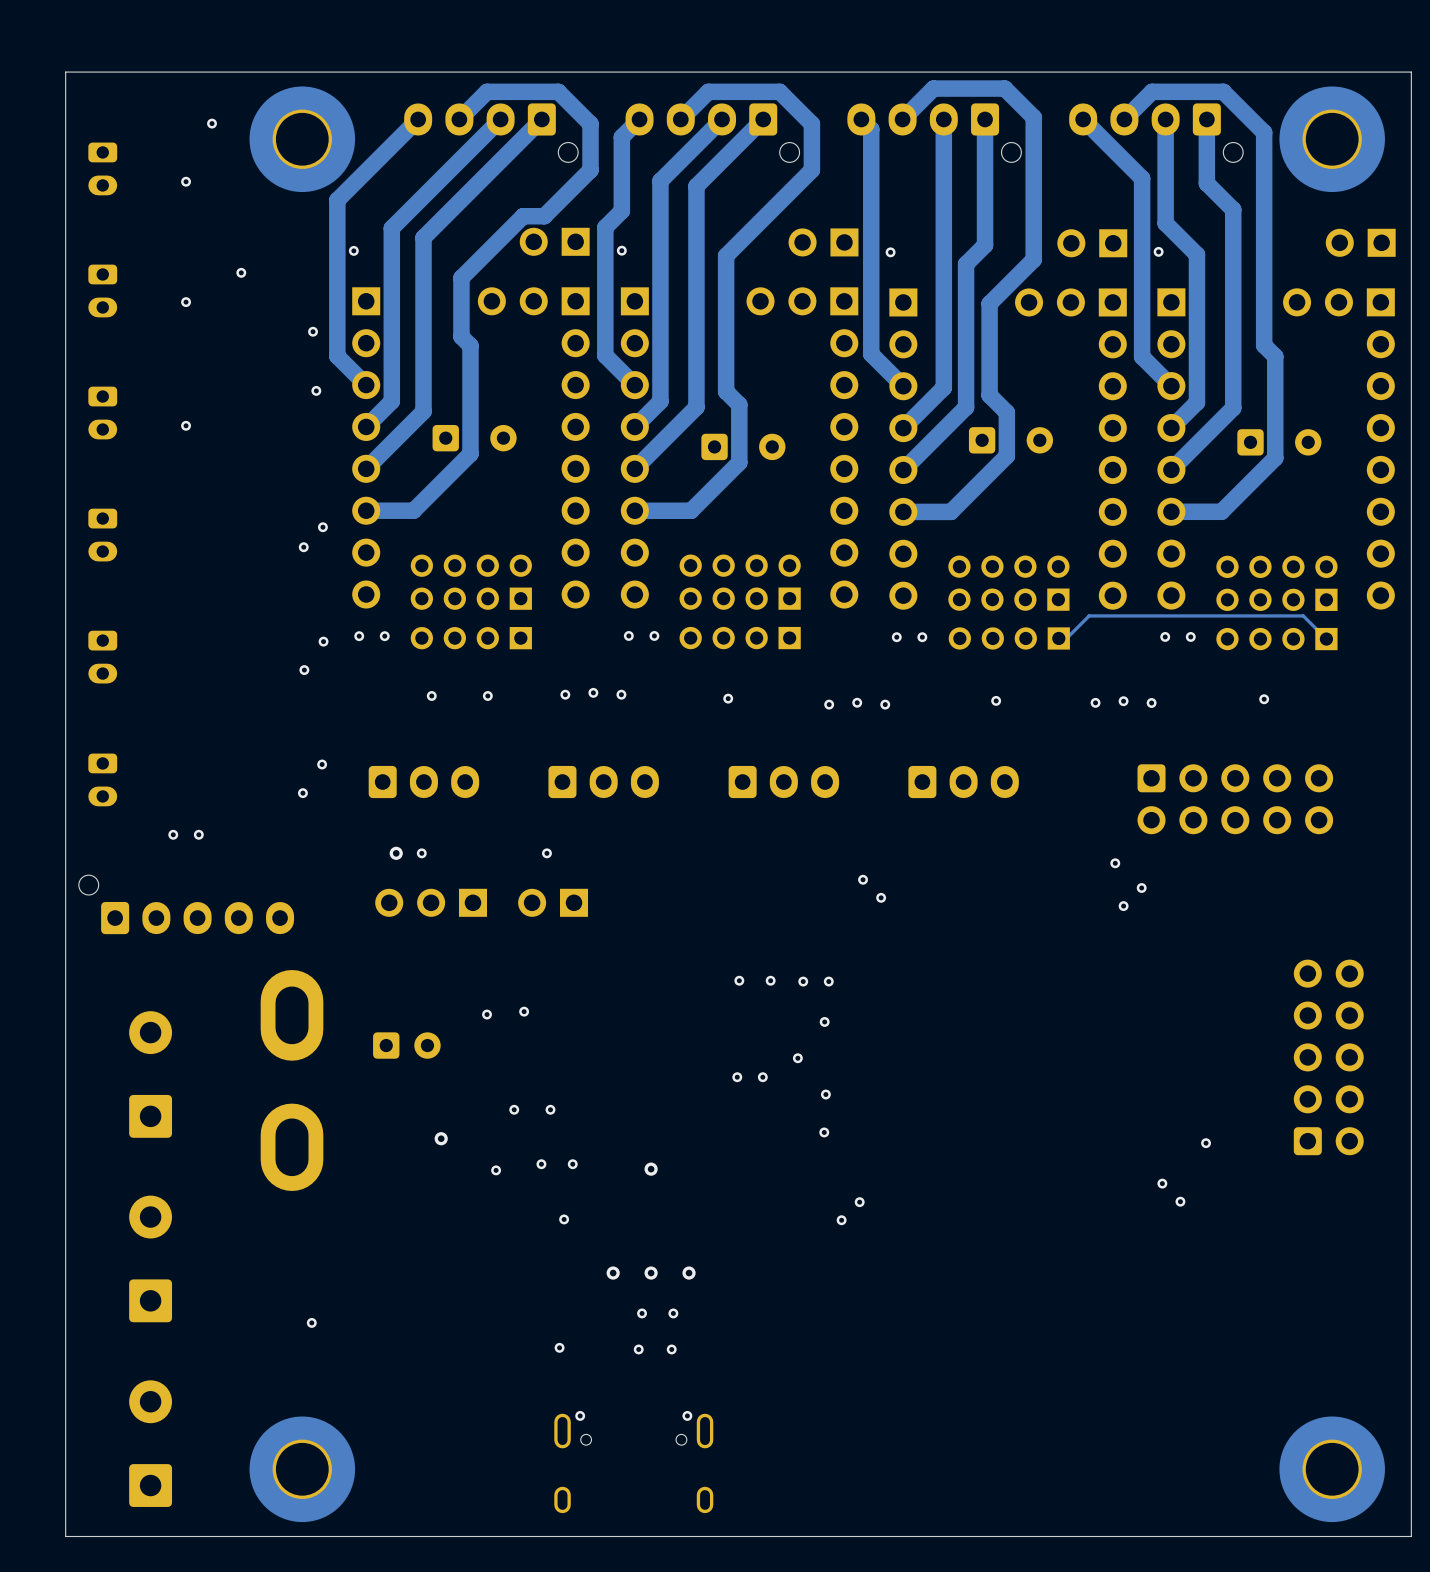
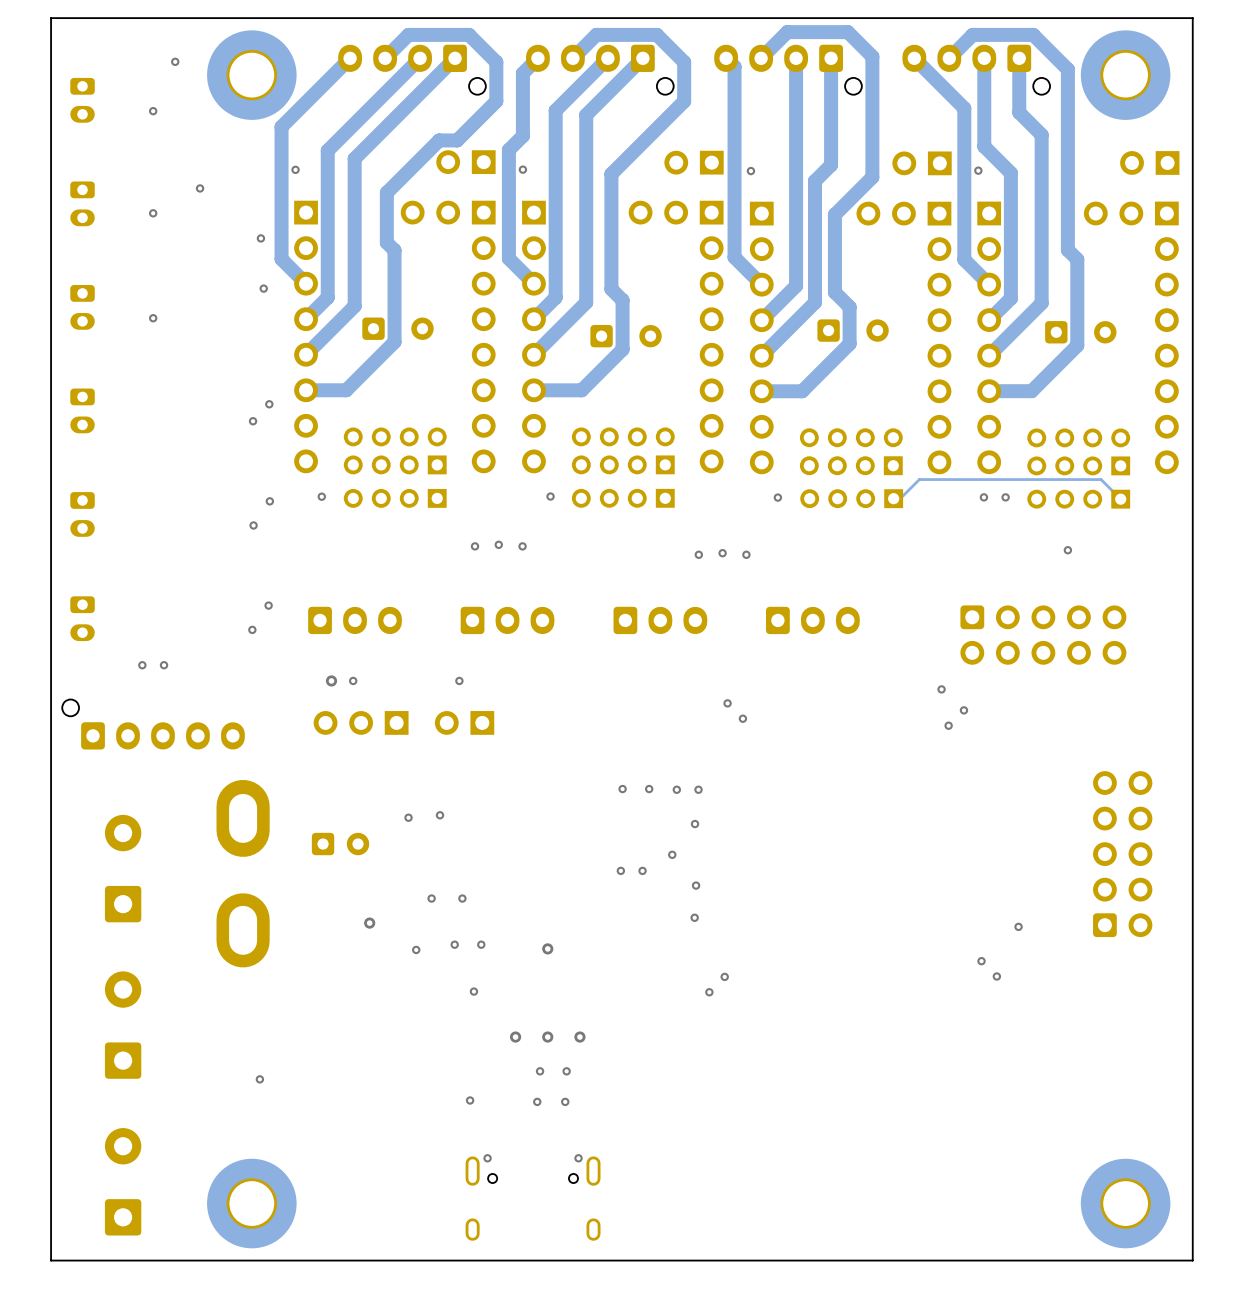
via: (628, 635) -> none
via: (359, 636) -> none
via: (896, 637) -> none
via: (431, 695) -> none
via: (487, 695) -> none
via: (728, 698) -> none
via: (996, 700) -> none
via: (1123, 701) -> none
via: (1095, 702) -> none
via: (1151, 702) -> none

